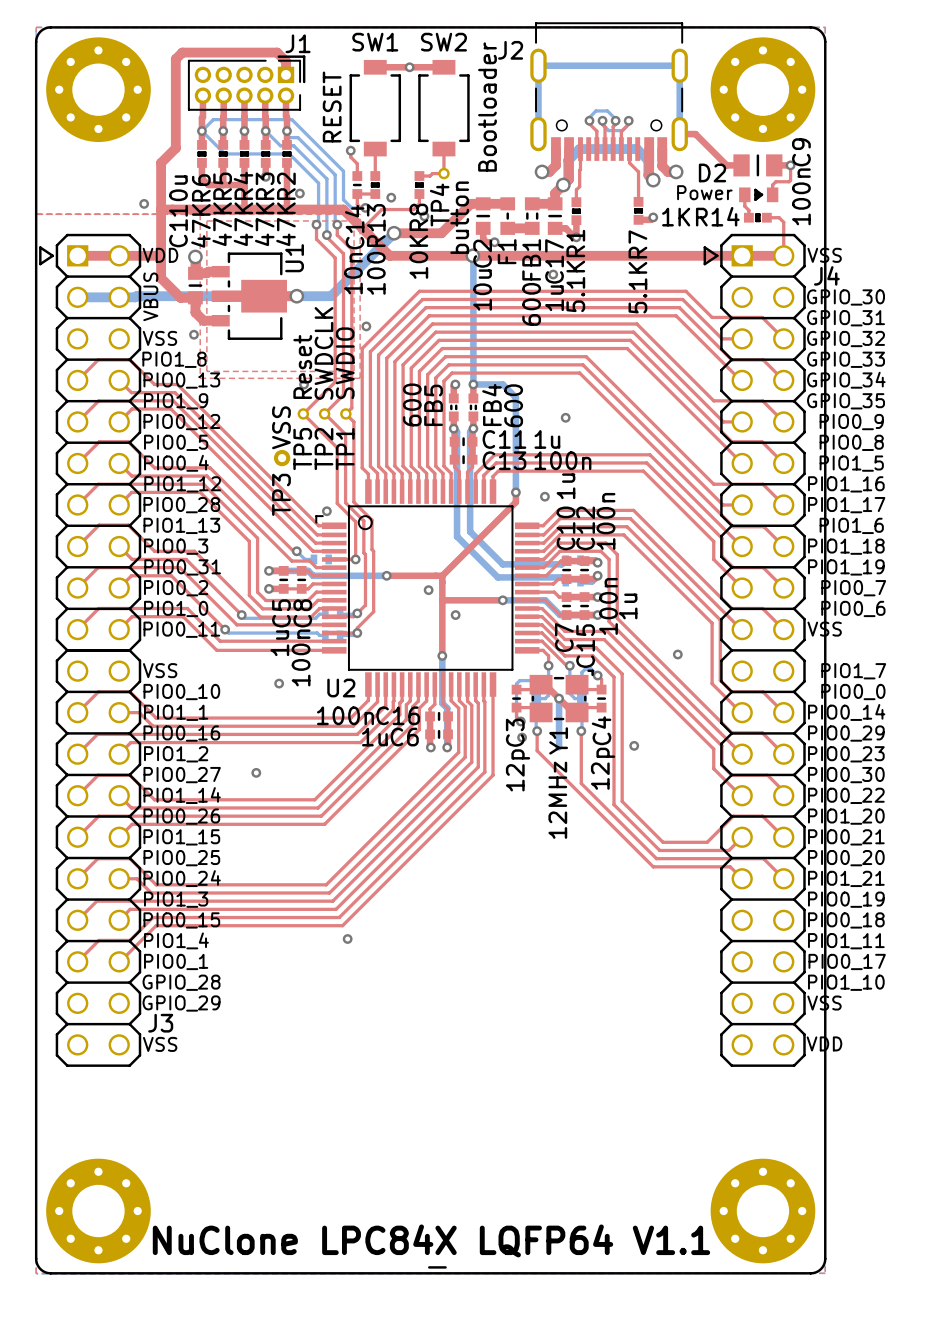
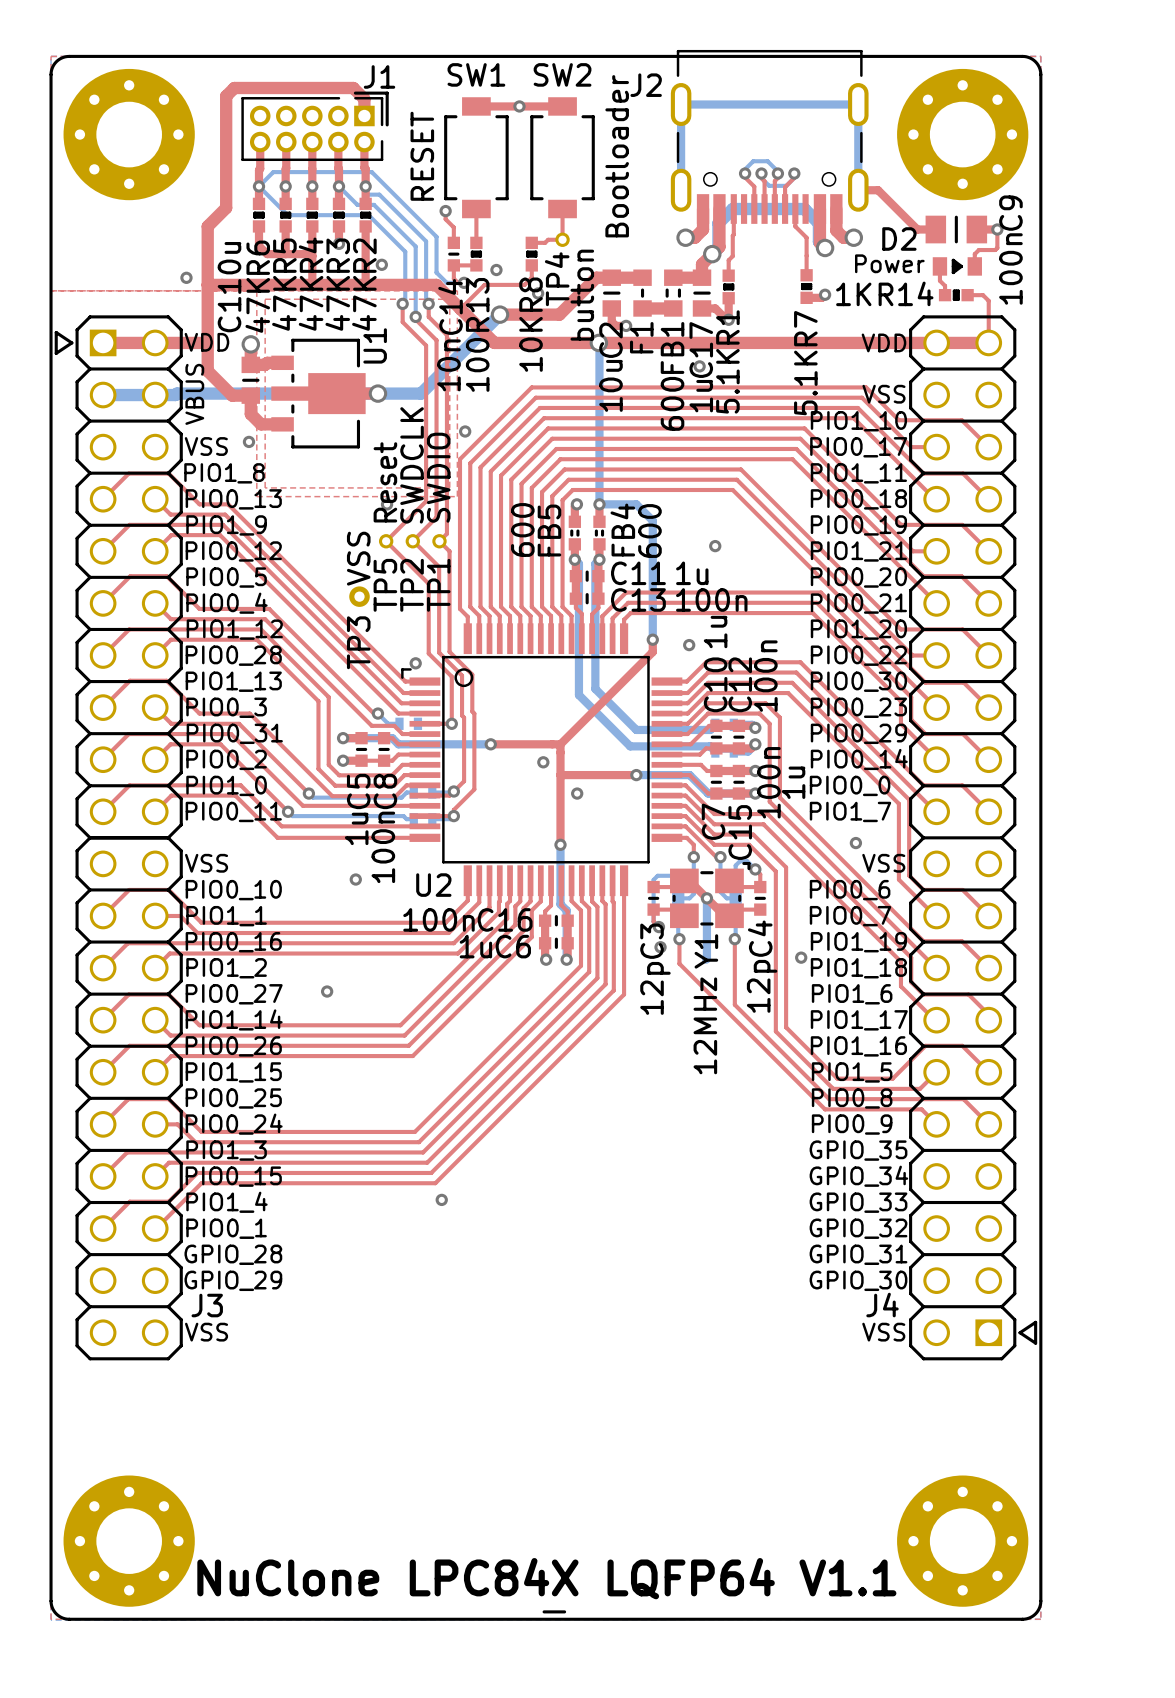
J4 rotation: 0° (754, 650) -> 180° (973, 837)

